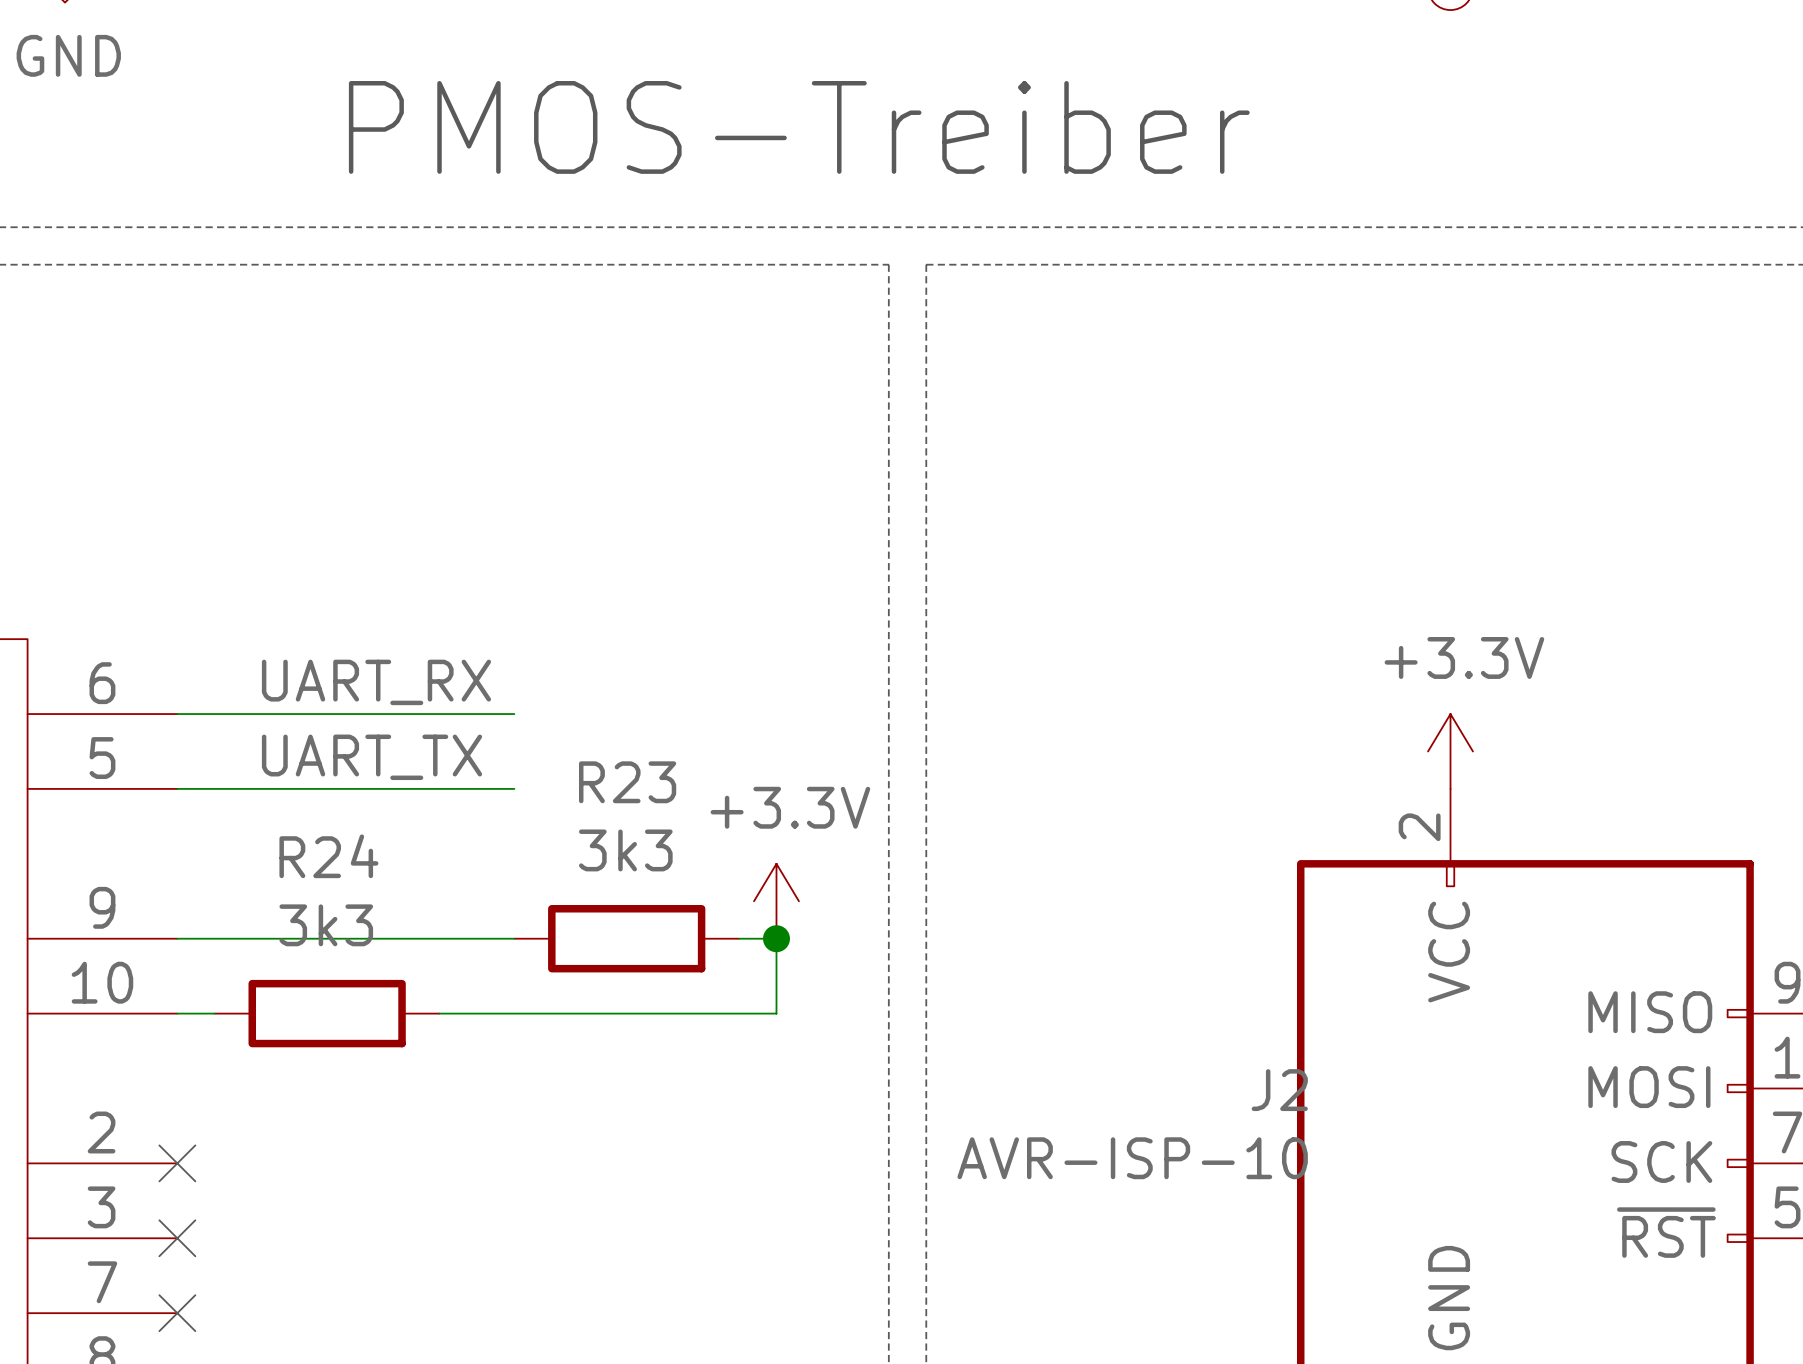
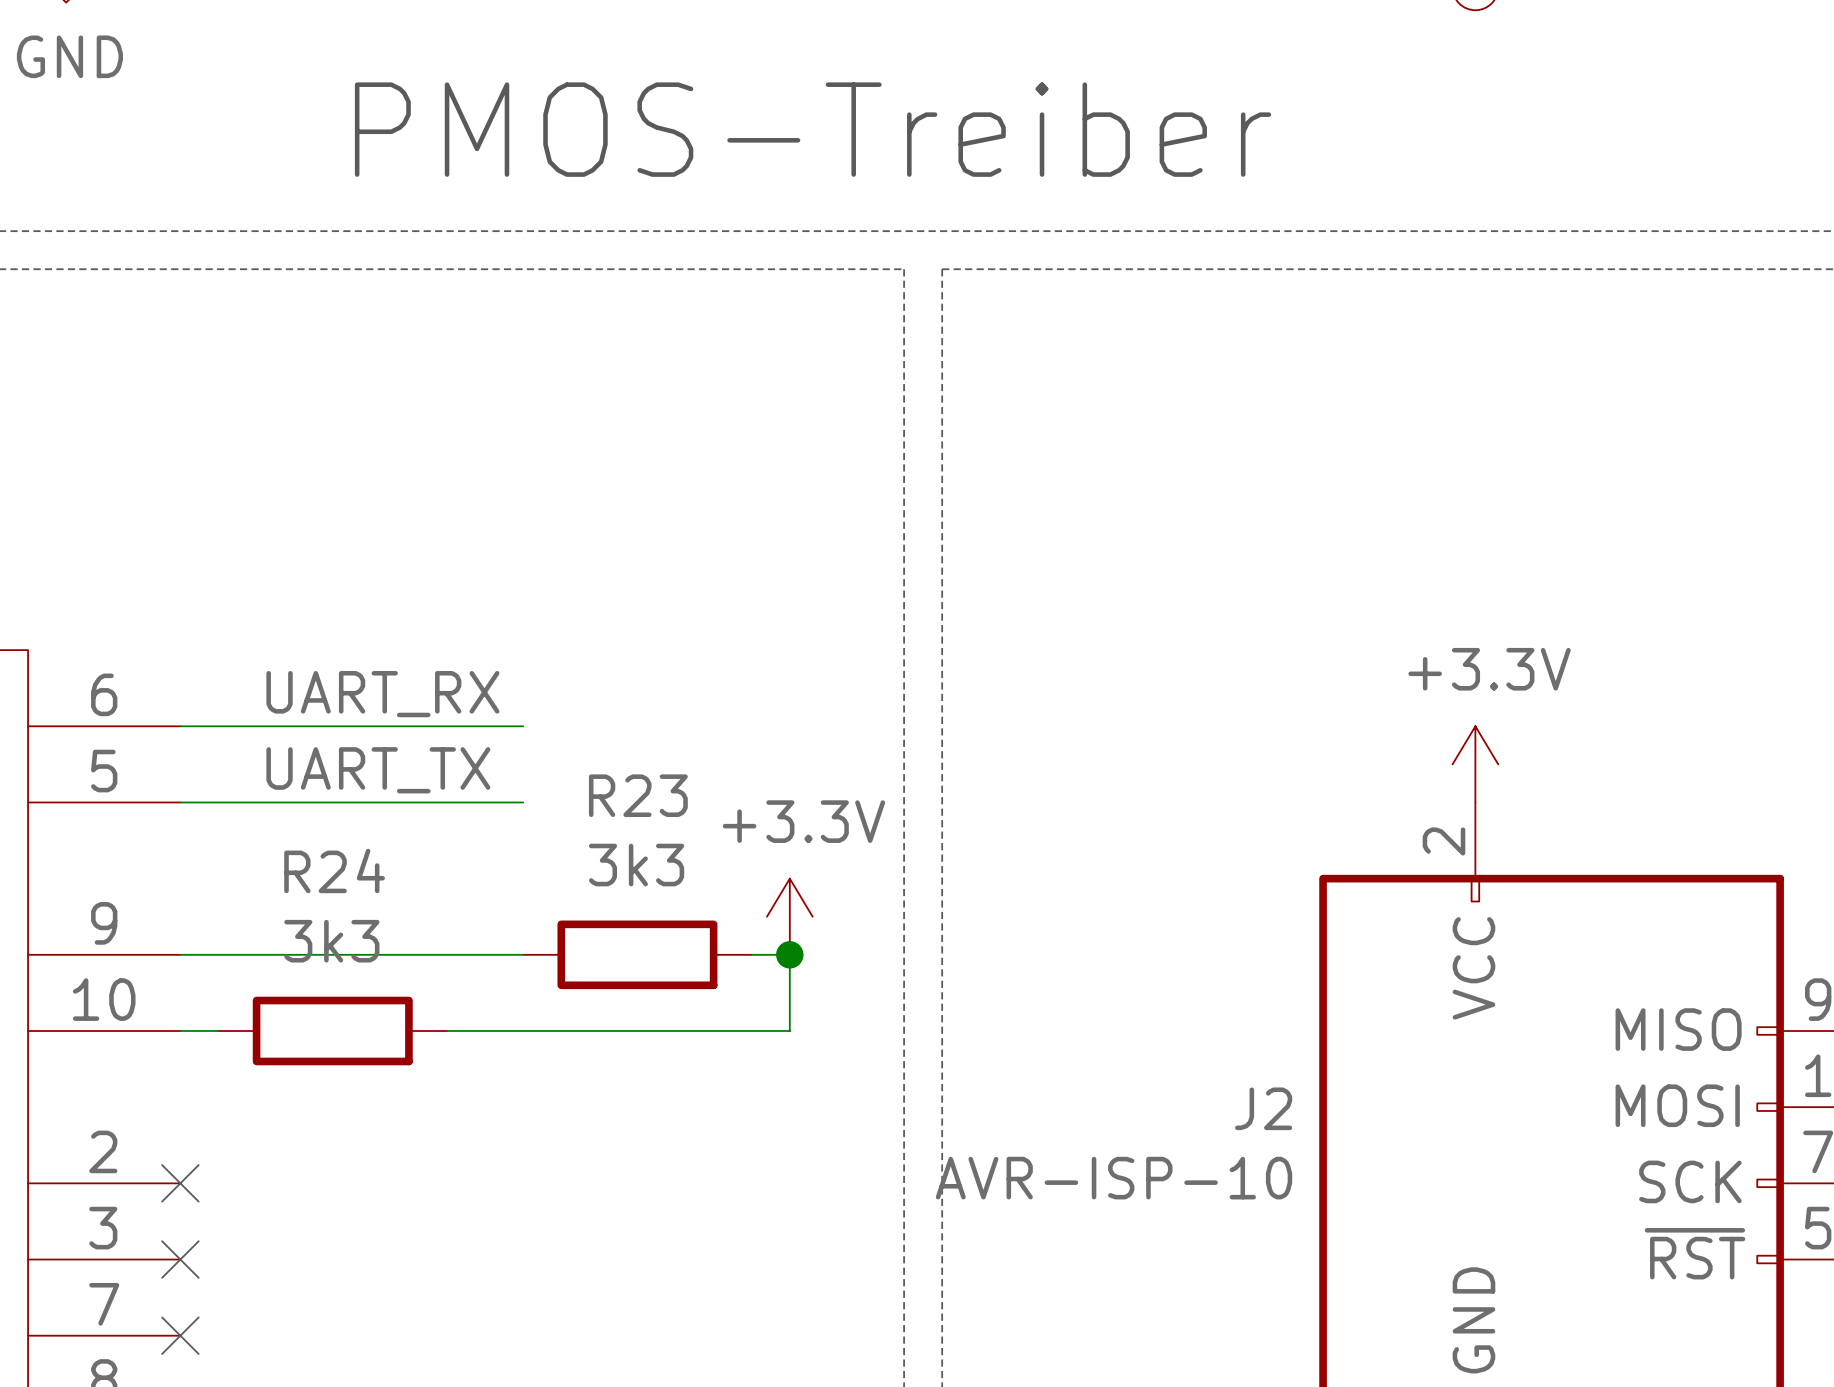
J2 name position: J2 (1279, 1090) -> J2 (1263, 1108)
J2 value position: AVR-ISP-10 (1132, 1158) -> AVR-ISP-10 (1114, 1178)

